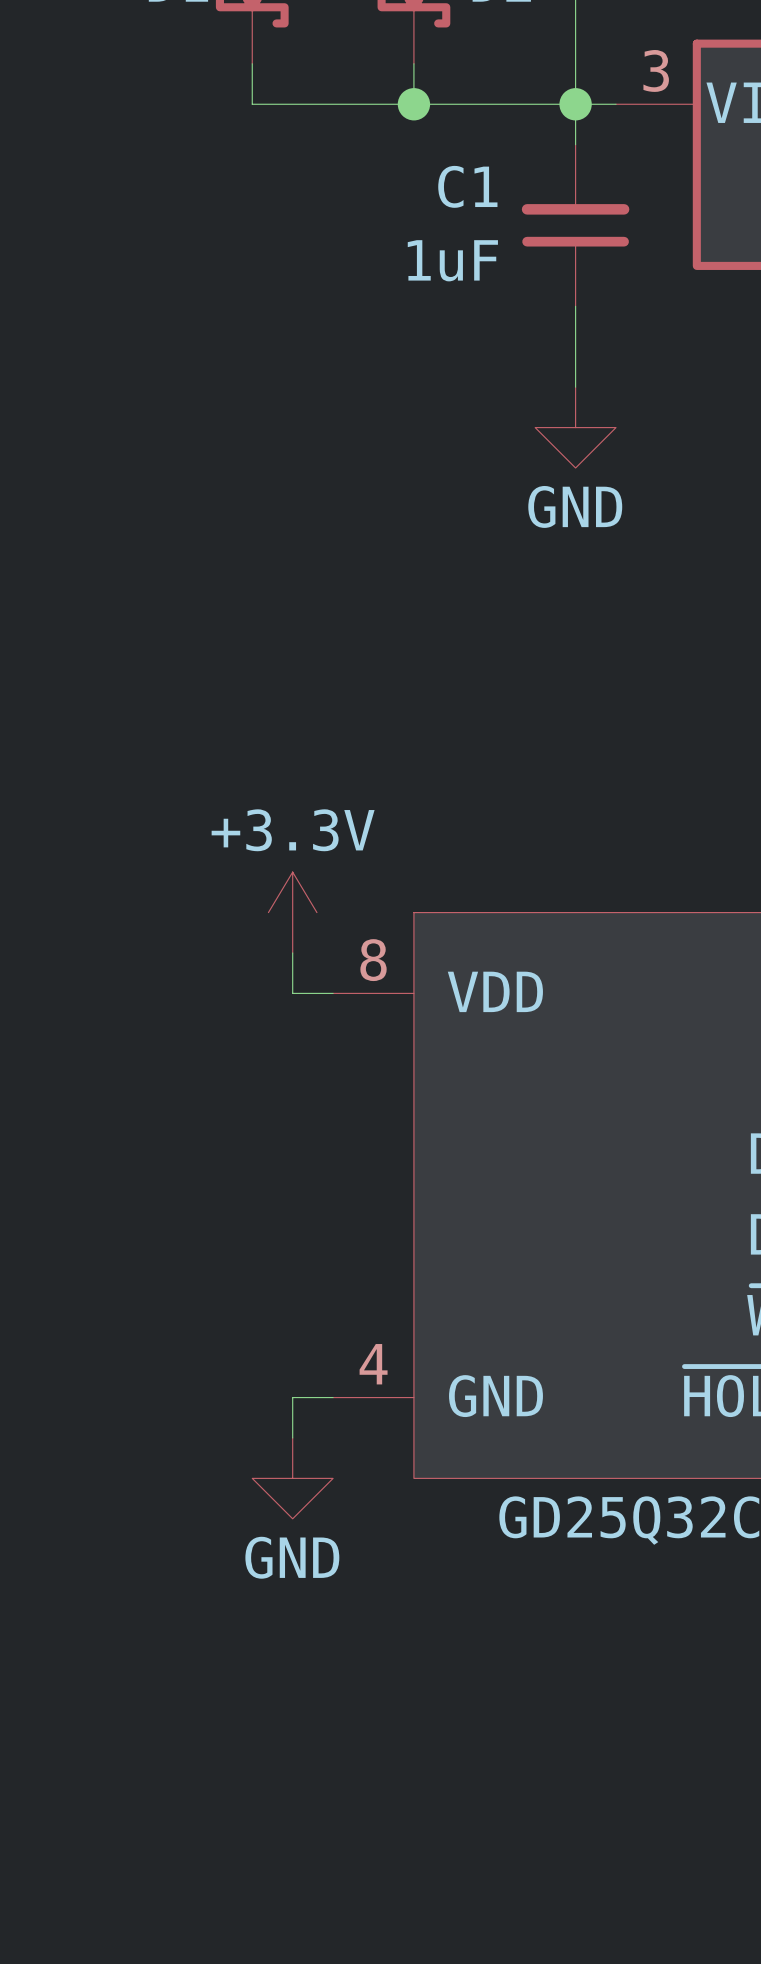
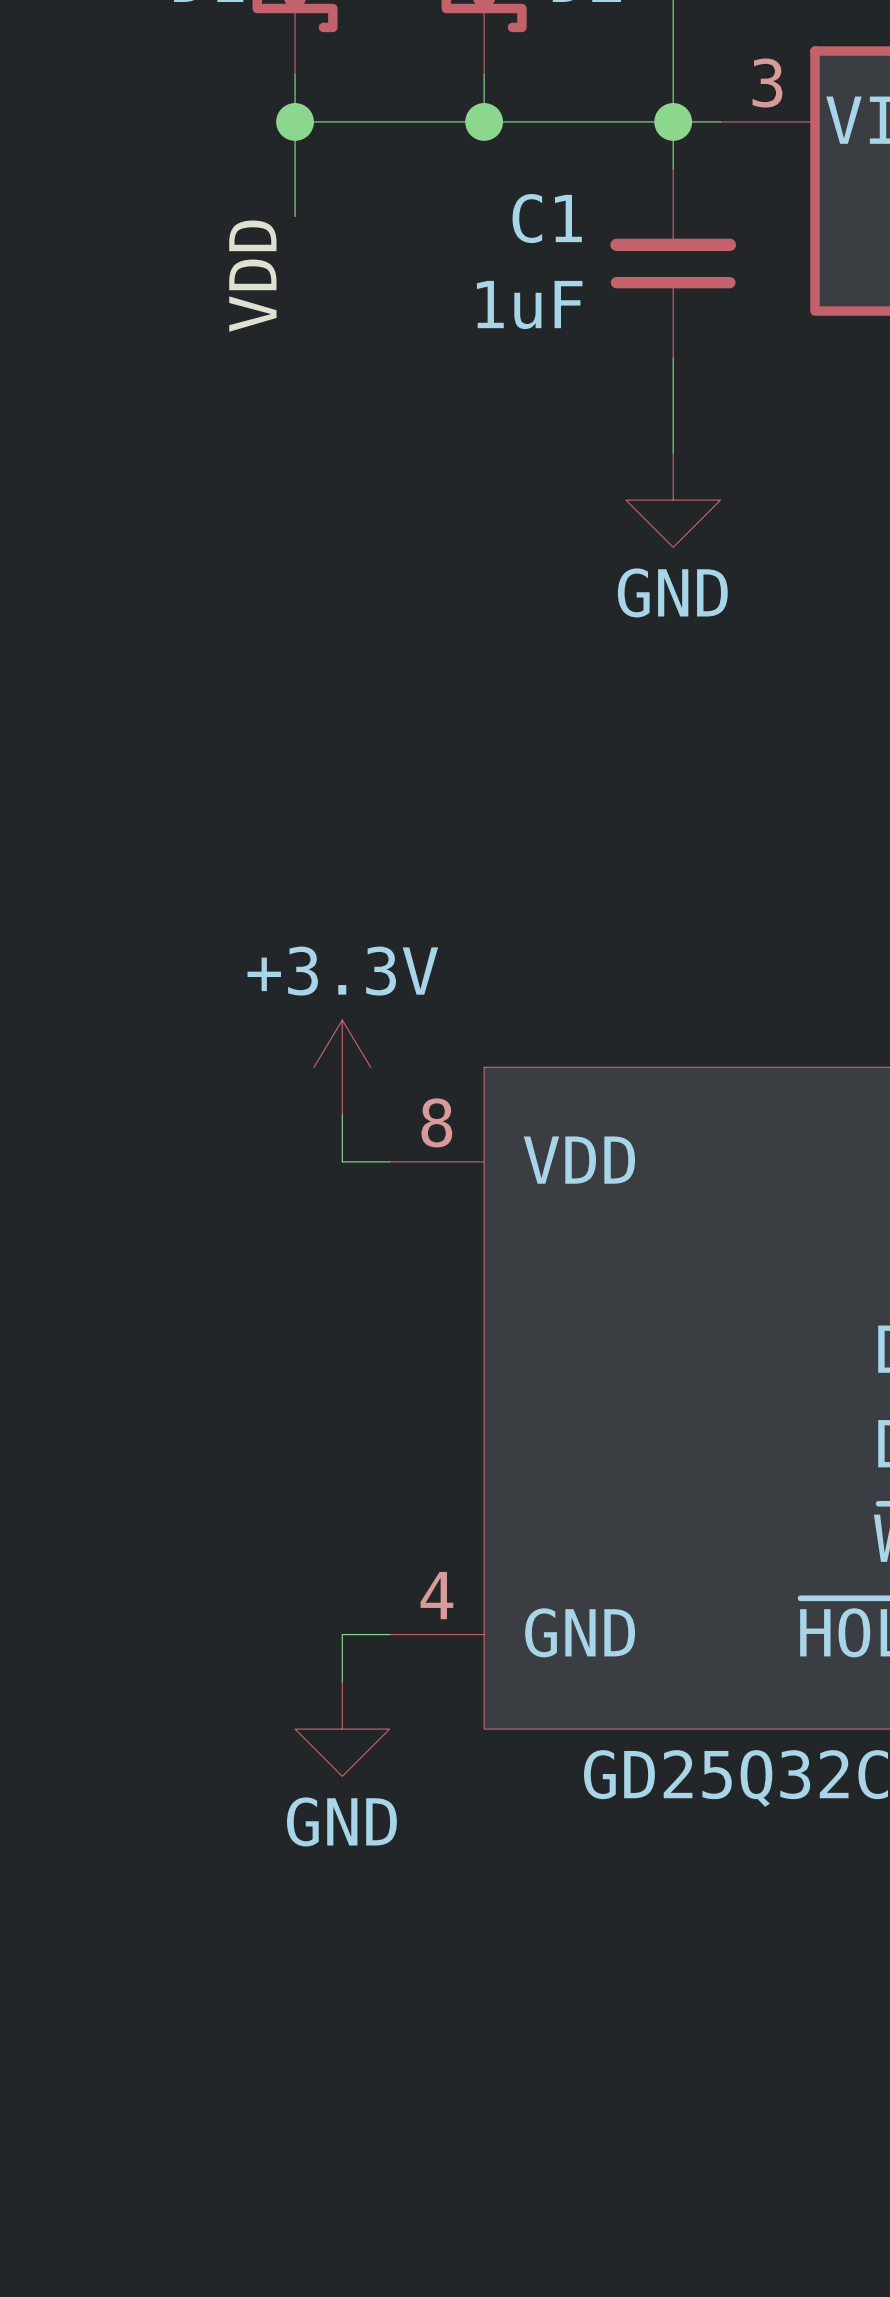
wire: none -> (295, 121) (295, 216)
junction: none -> (295, 121)
label: none -> VDD (252, 276)

